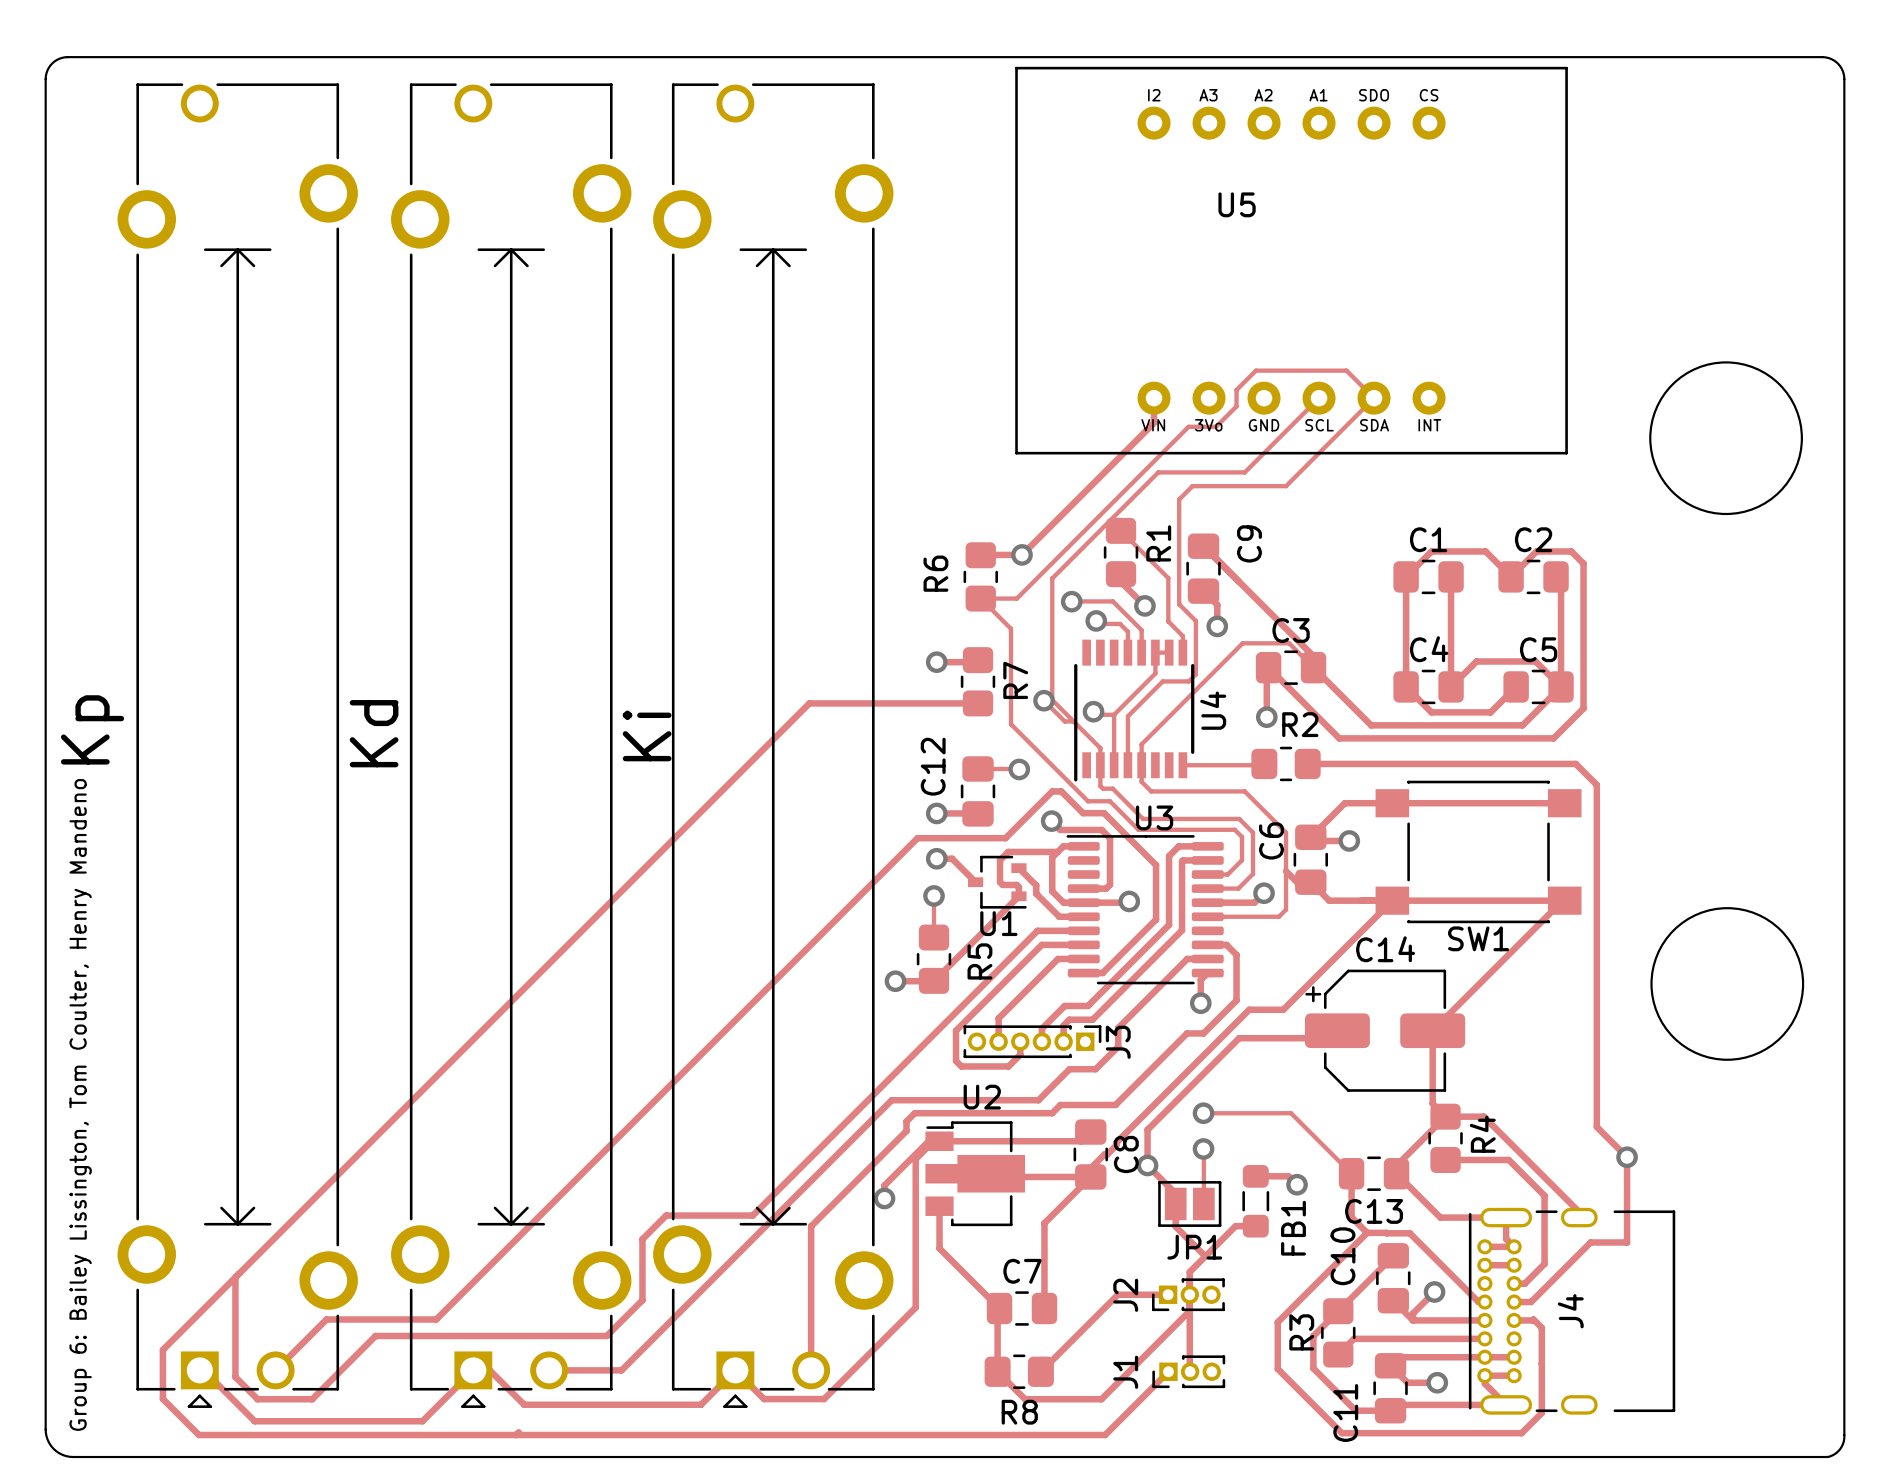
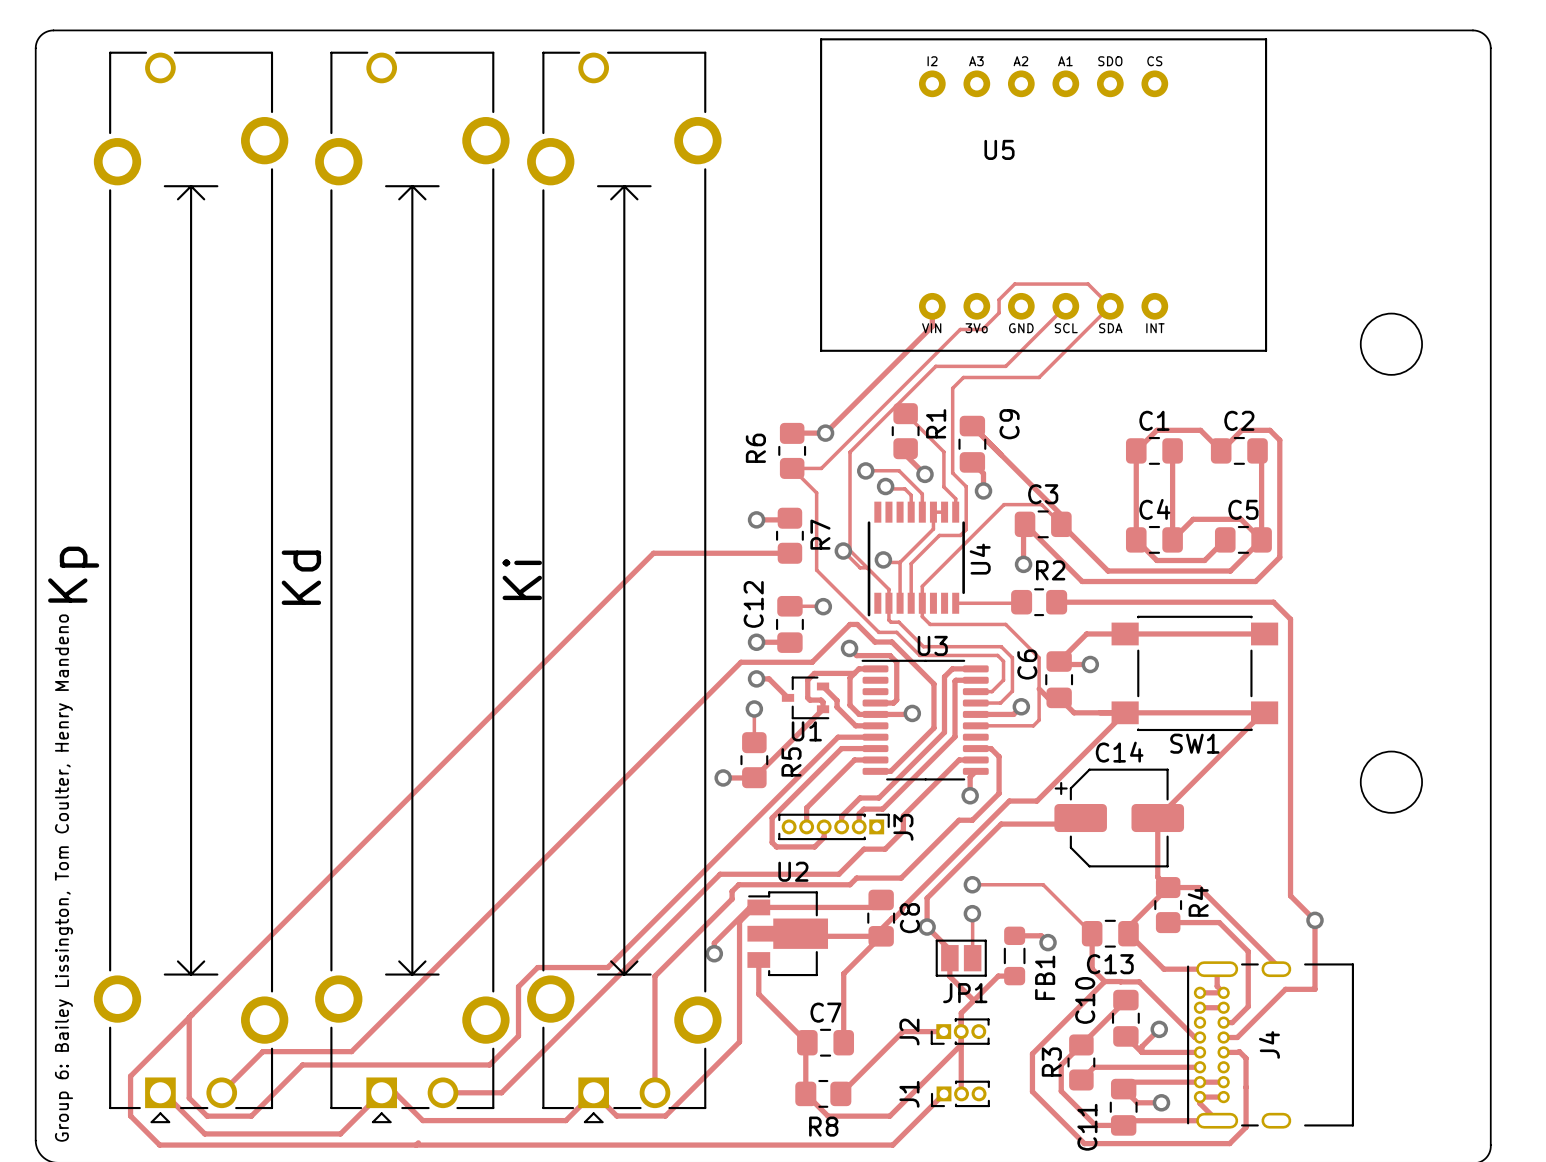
round board edge size: [1649, 361, 1803, 516] -> [1359, 312, 1423, 376]
round board edge size: [1650, 907, 1805, 1061] -> [1359, 750, 1423, 814]

